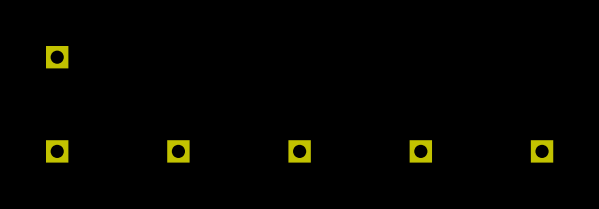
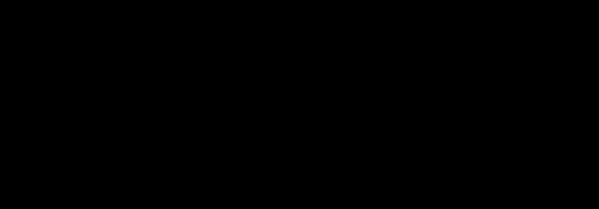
part: (57, 57) -> none
part: (57, 151) -> none
part: (178, 151) -> none
part: (299, 151) -> none
part: (420, 151) -> none
part: (542, 151) -> none

